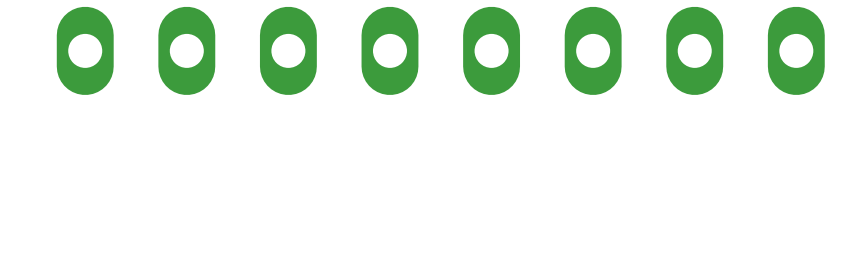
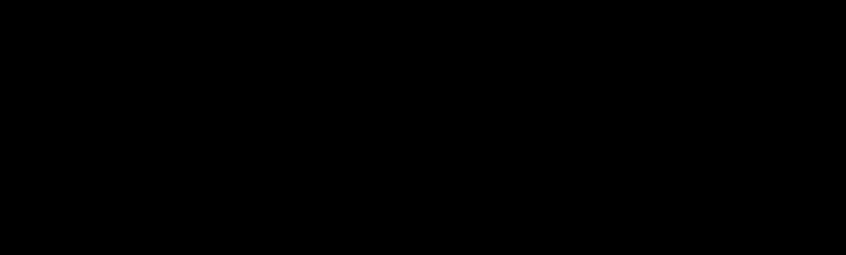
part: (440, 50) -> none

